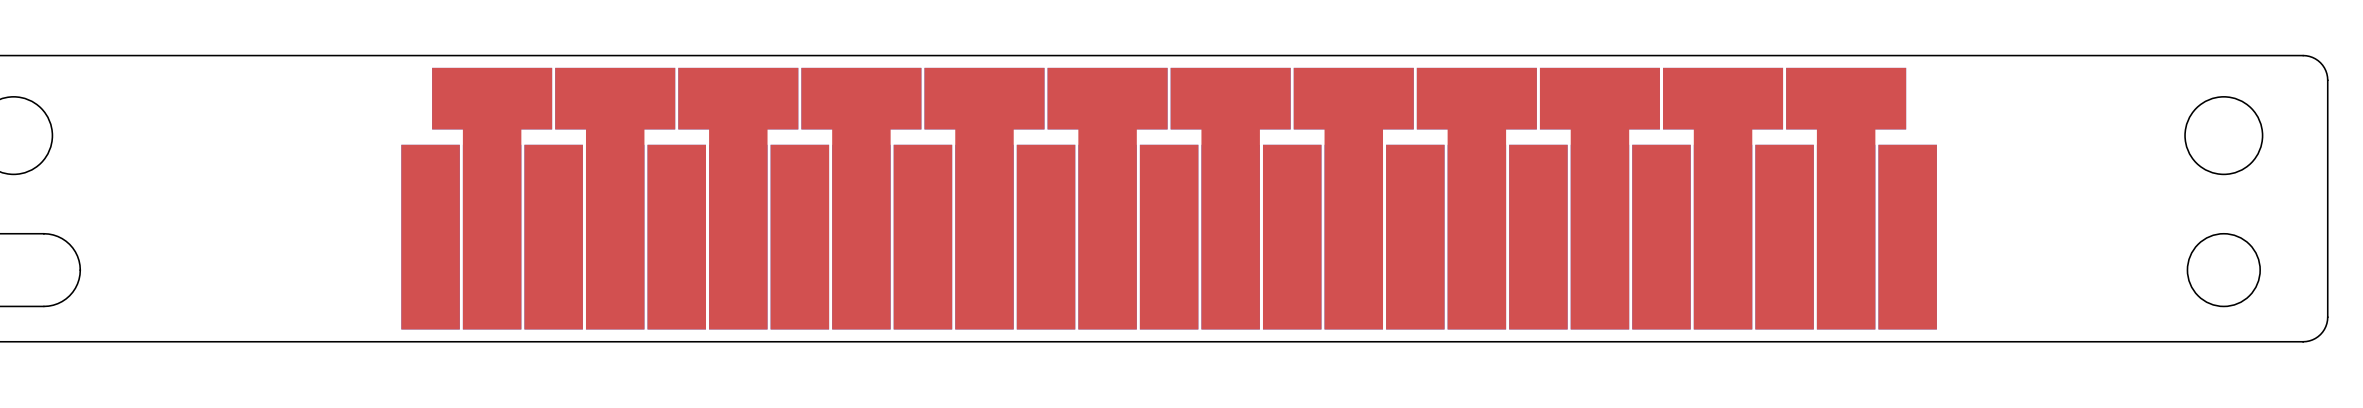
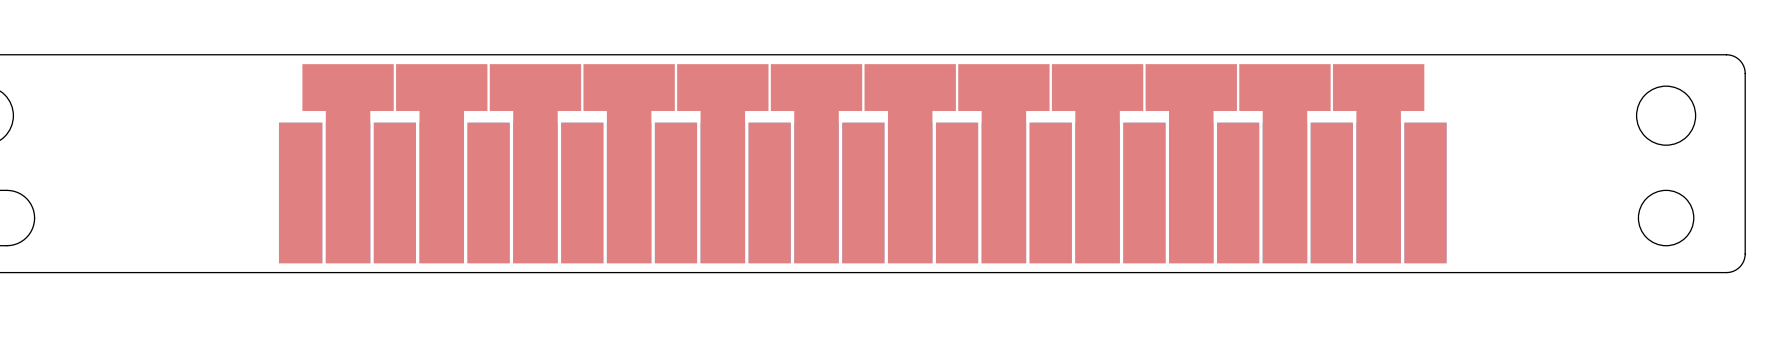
drawing: [401, 67, 1937, 330] -> none
drawing: none -> [278, 122, 323, 264]
drawing: none -> [373, 122, 416, 264]
drawing: none -> [467, 122, 510, 264]
drawing: none -> [561, 122, 604, 264]
drawing: none -> [654, 122, 698, 264]
drawing: none -> [748, 122, 791, 264]
drawing: none -> [842, 122, 885, 264]
drawing: none -> [935, 122, 979, 264]
drawing: none -> [1029, 122, 1072, 264]
drawing: none -> [1123, 122, 1166, 264]
drawing: none -> [1217, 122, 1260, 264]
drawing: none -> [1310, 122, 1353, 264]
drawing: none -> [1404, 122, 1447, 264]

